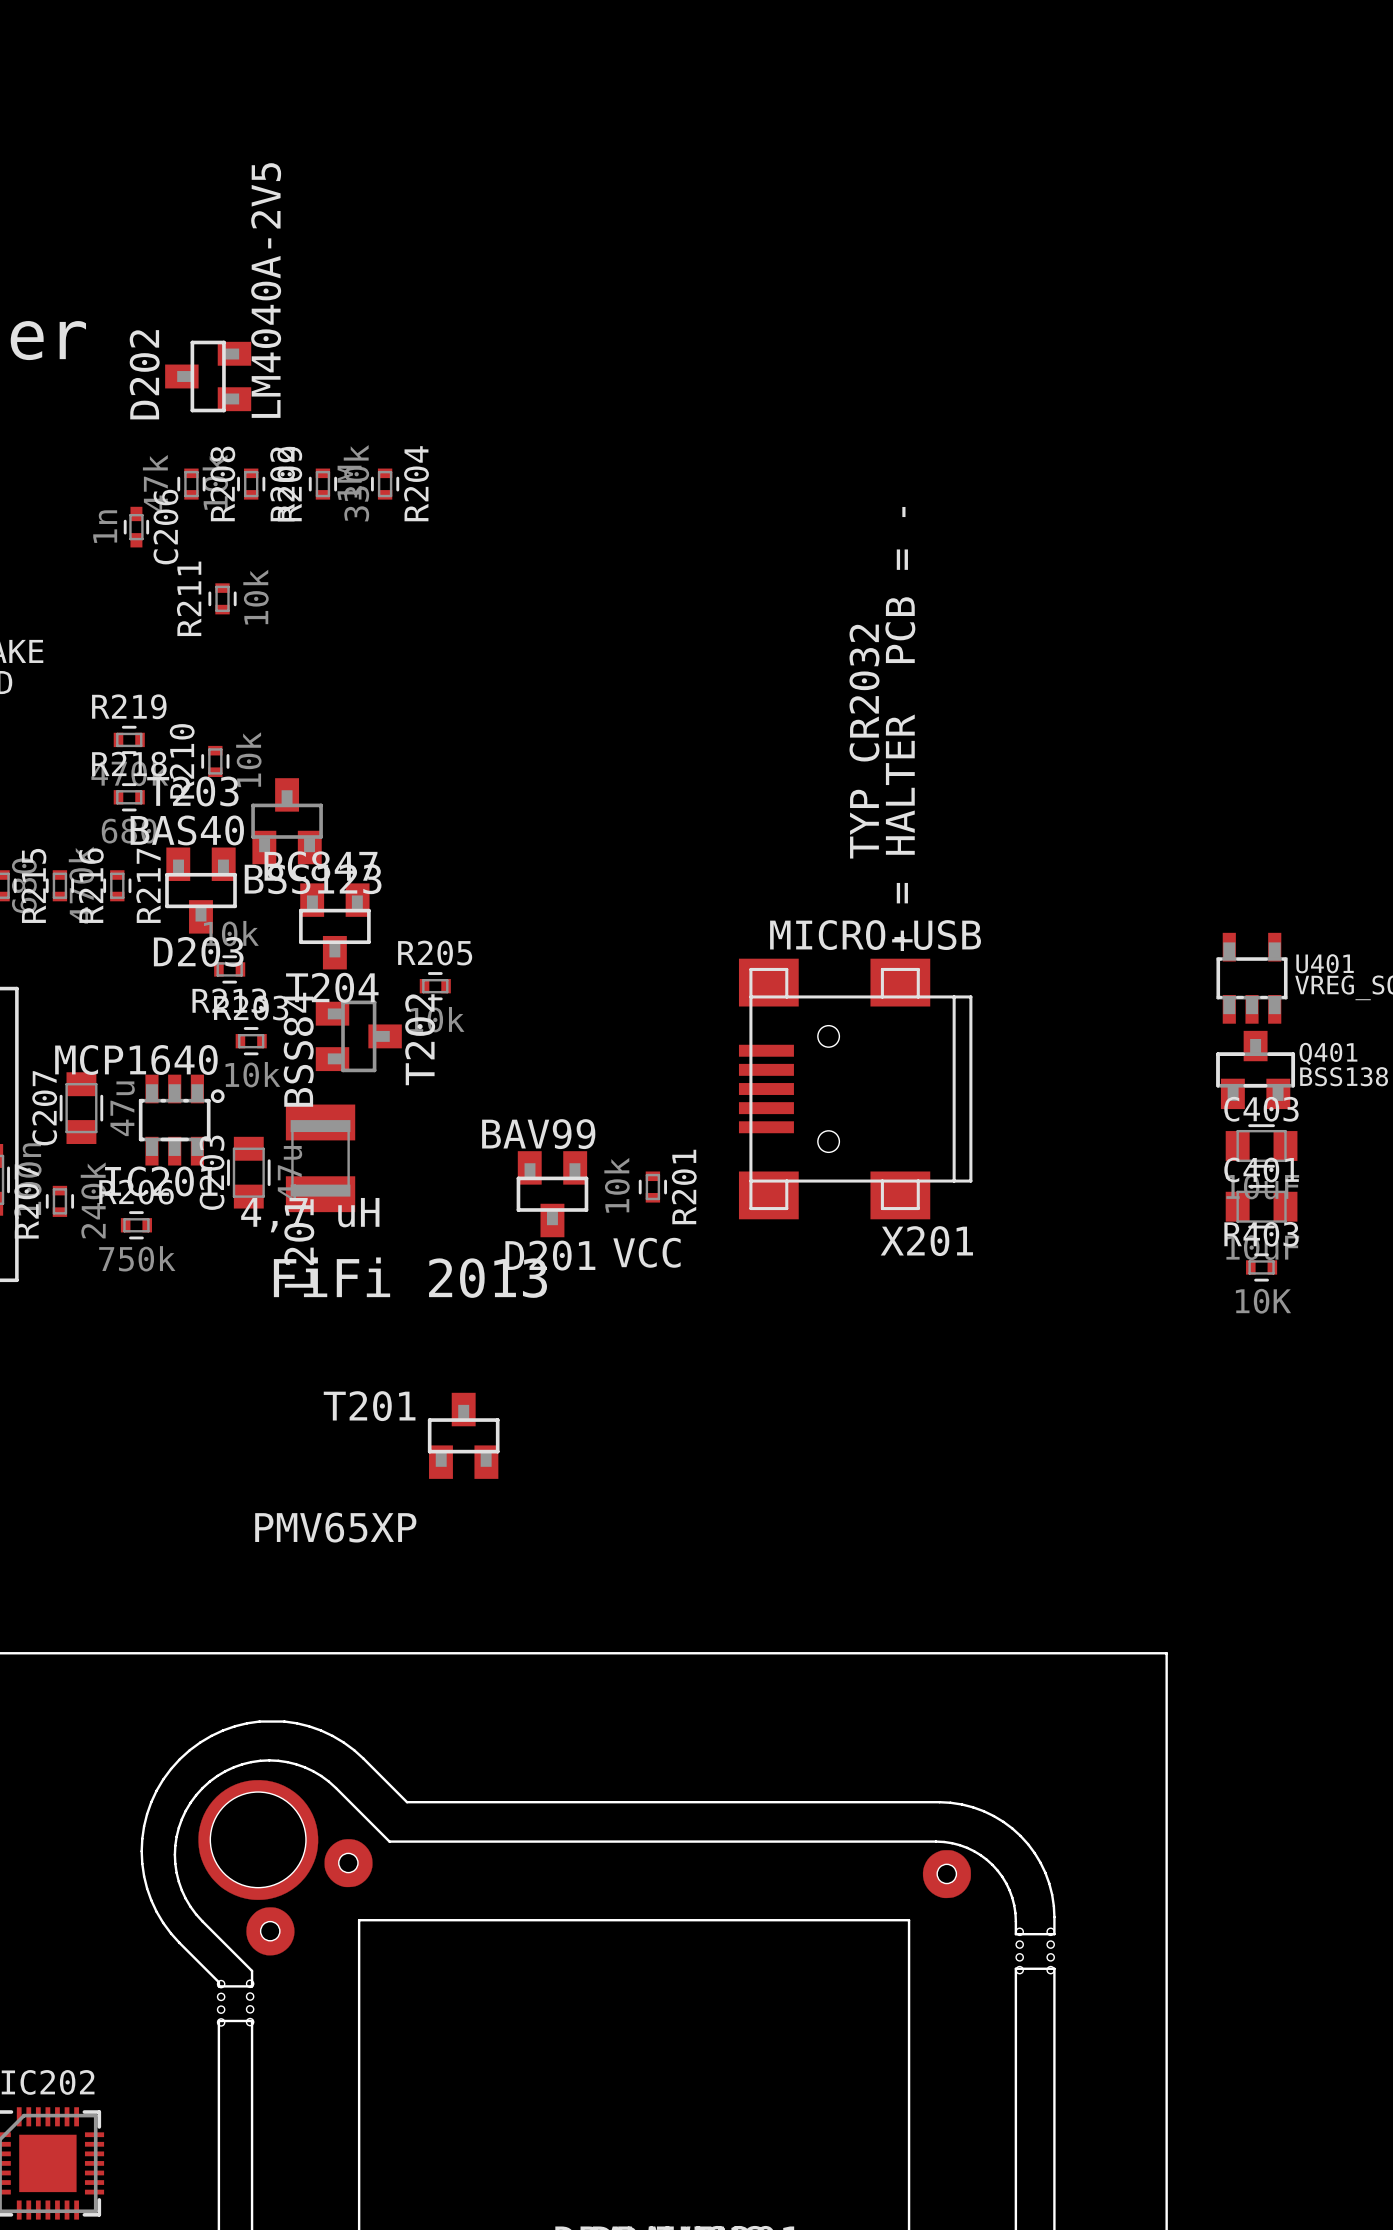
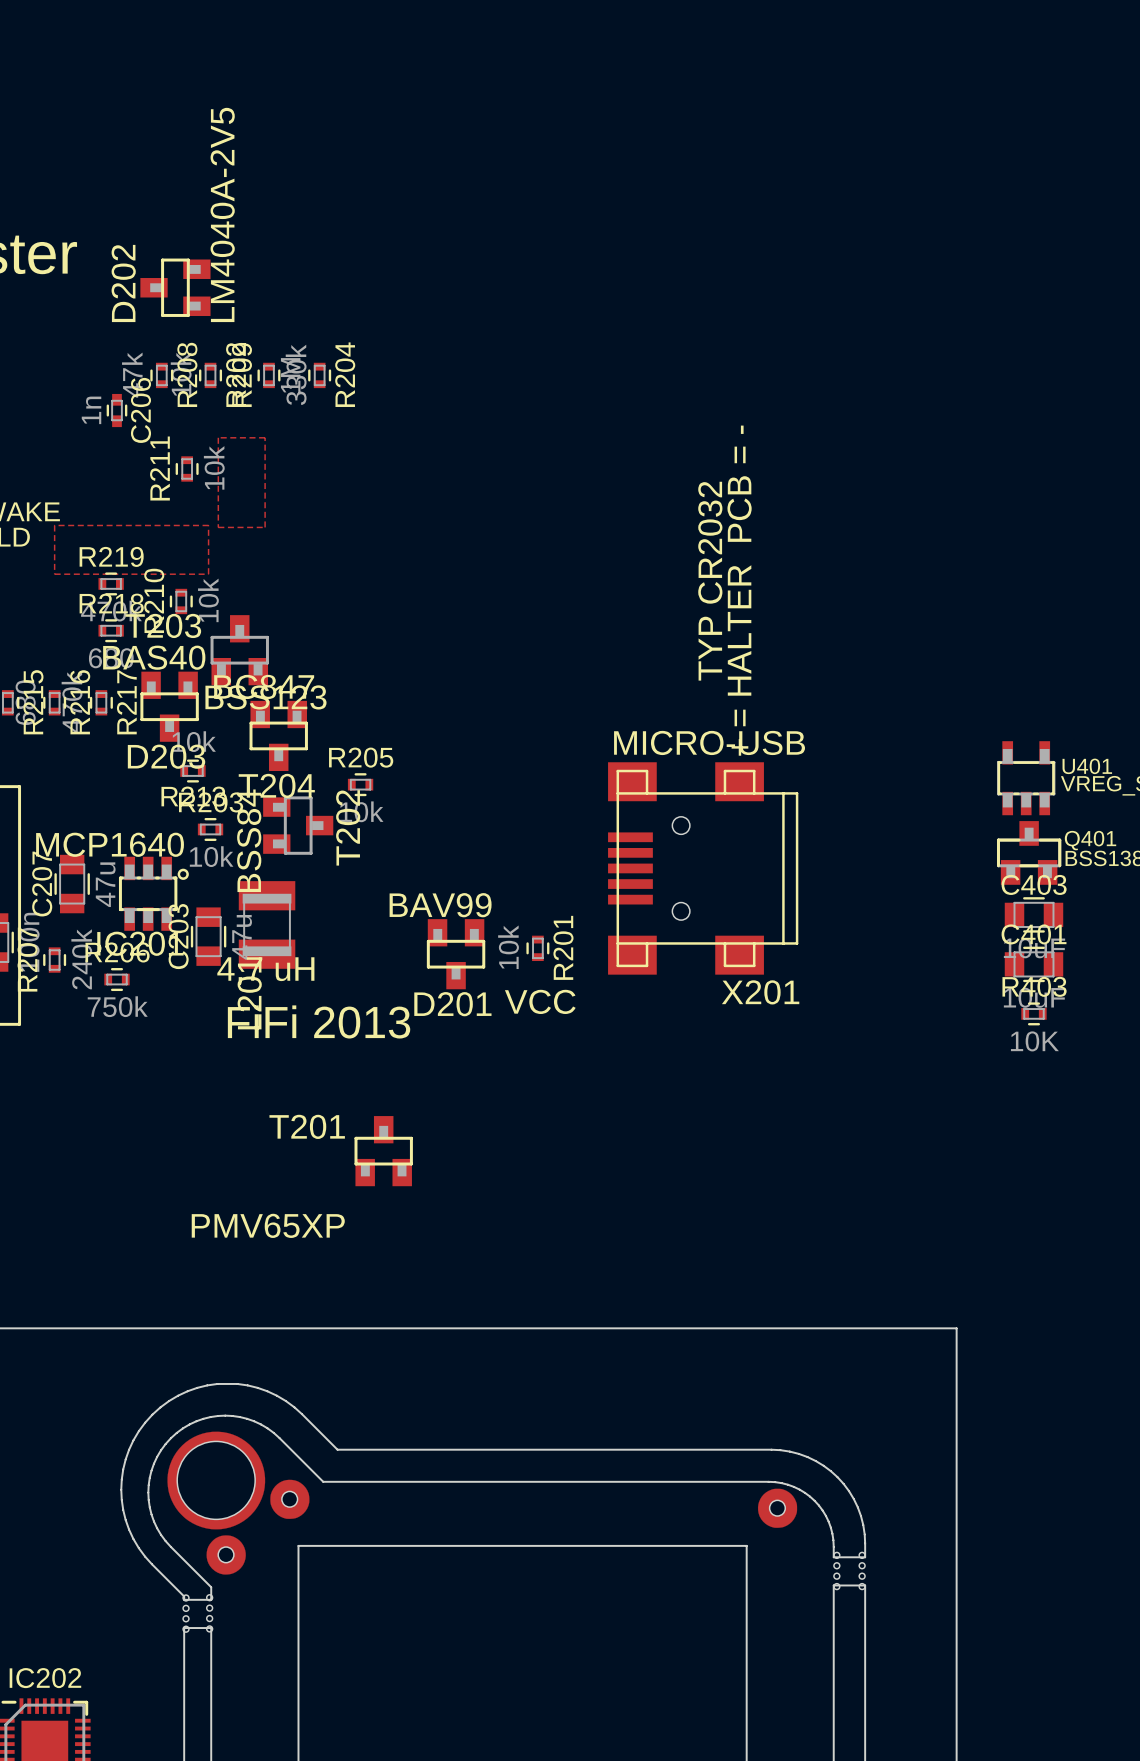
zone outline: none -> (218, 437) (218, 527) (265, 527) (265, 437) (218, 437)
zone outline: none -> (54, 525) (54, 574) (208, 574) (208, 525) (54, 525)

